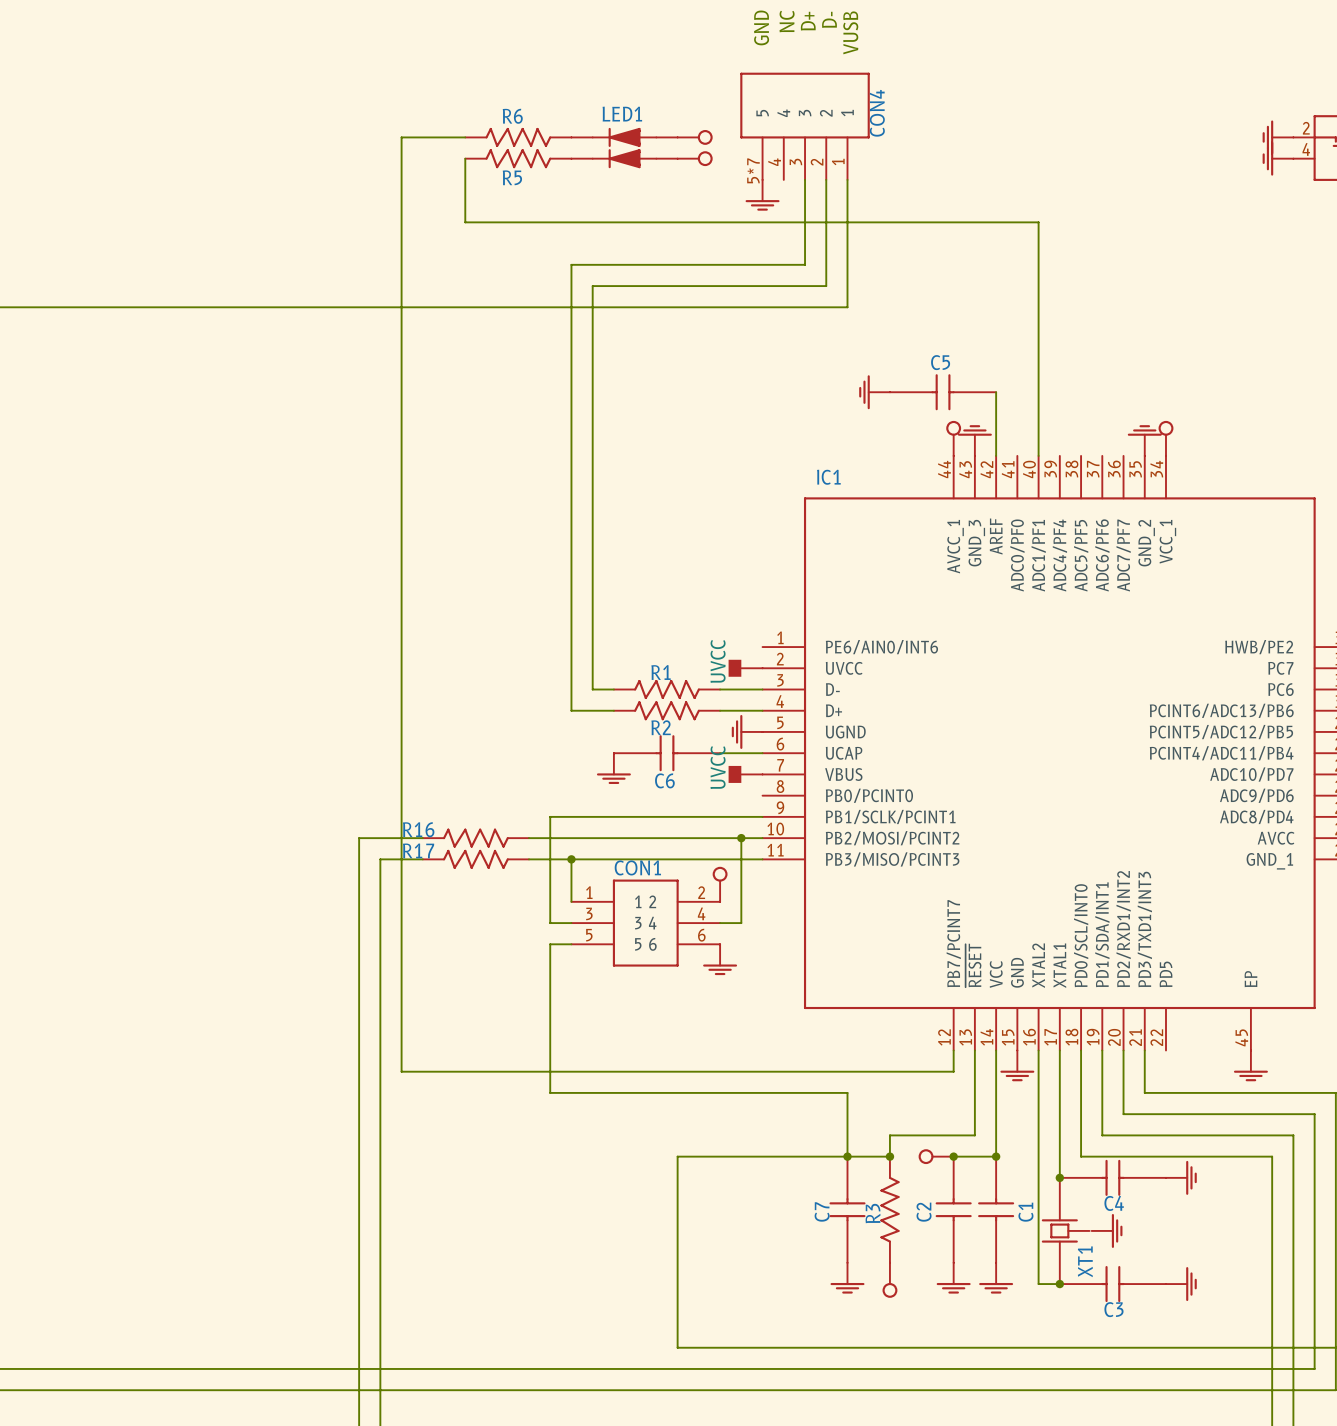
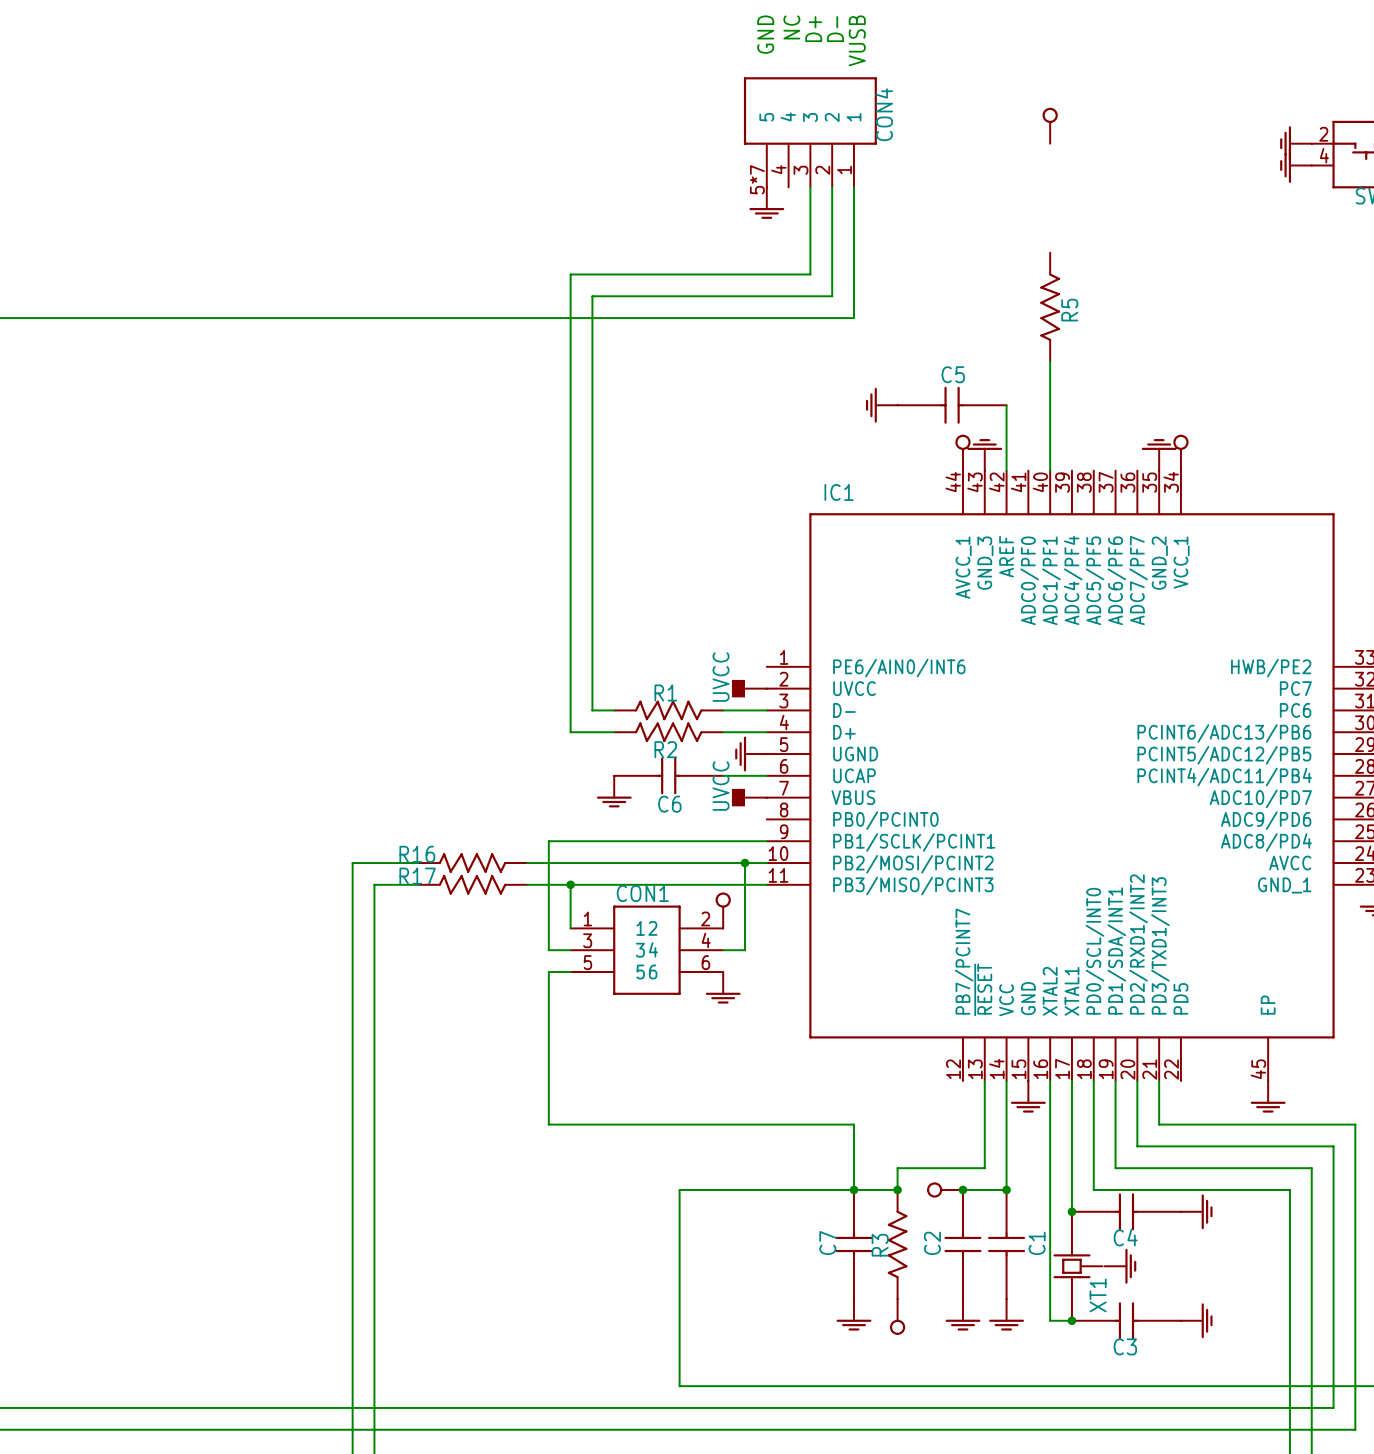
power symbol: none -> (1050, 125)
wire: (465, 137) (401, 137) (401, 1071) (953, 1071) (953, 1050) -> none
R6: (518, 137) -> none
power symbol: (695, 137) -> none
LED1: (624, 148) -> none
wire: (465, 158) (465, 222) (1038, 222) (1038, 349) -> none
R5 rotation: 0° (518, 158) -> 90° counterclockwise (1050, 307)
R5 position: (518, 158) -> (1050, 307)
power symbol: (695, 158) -> none

